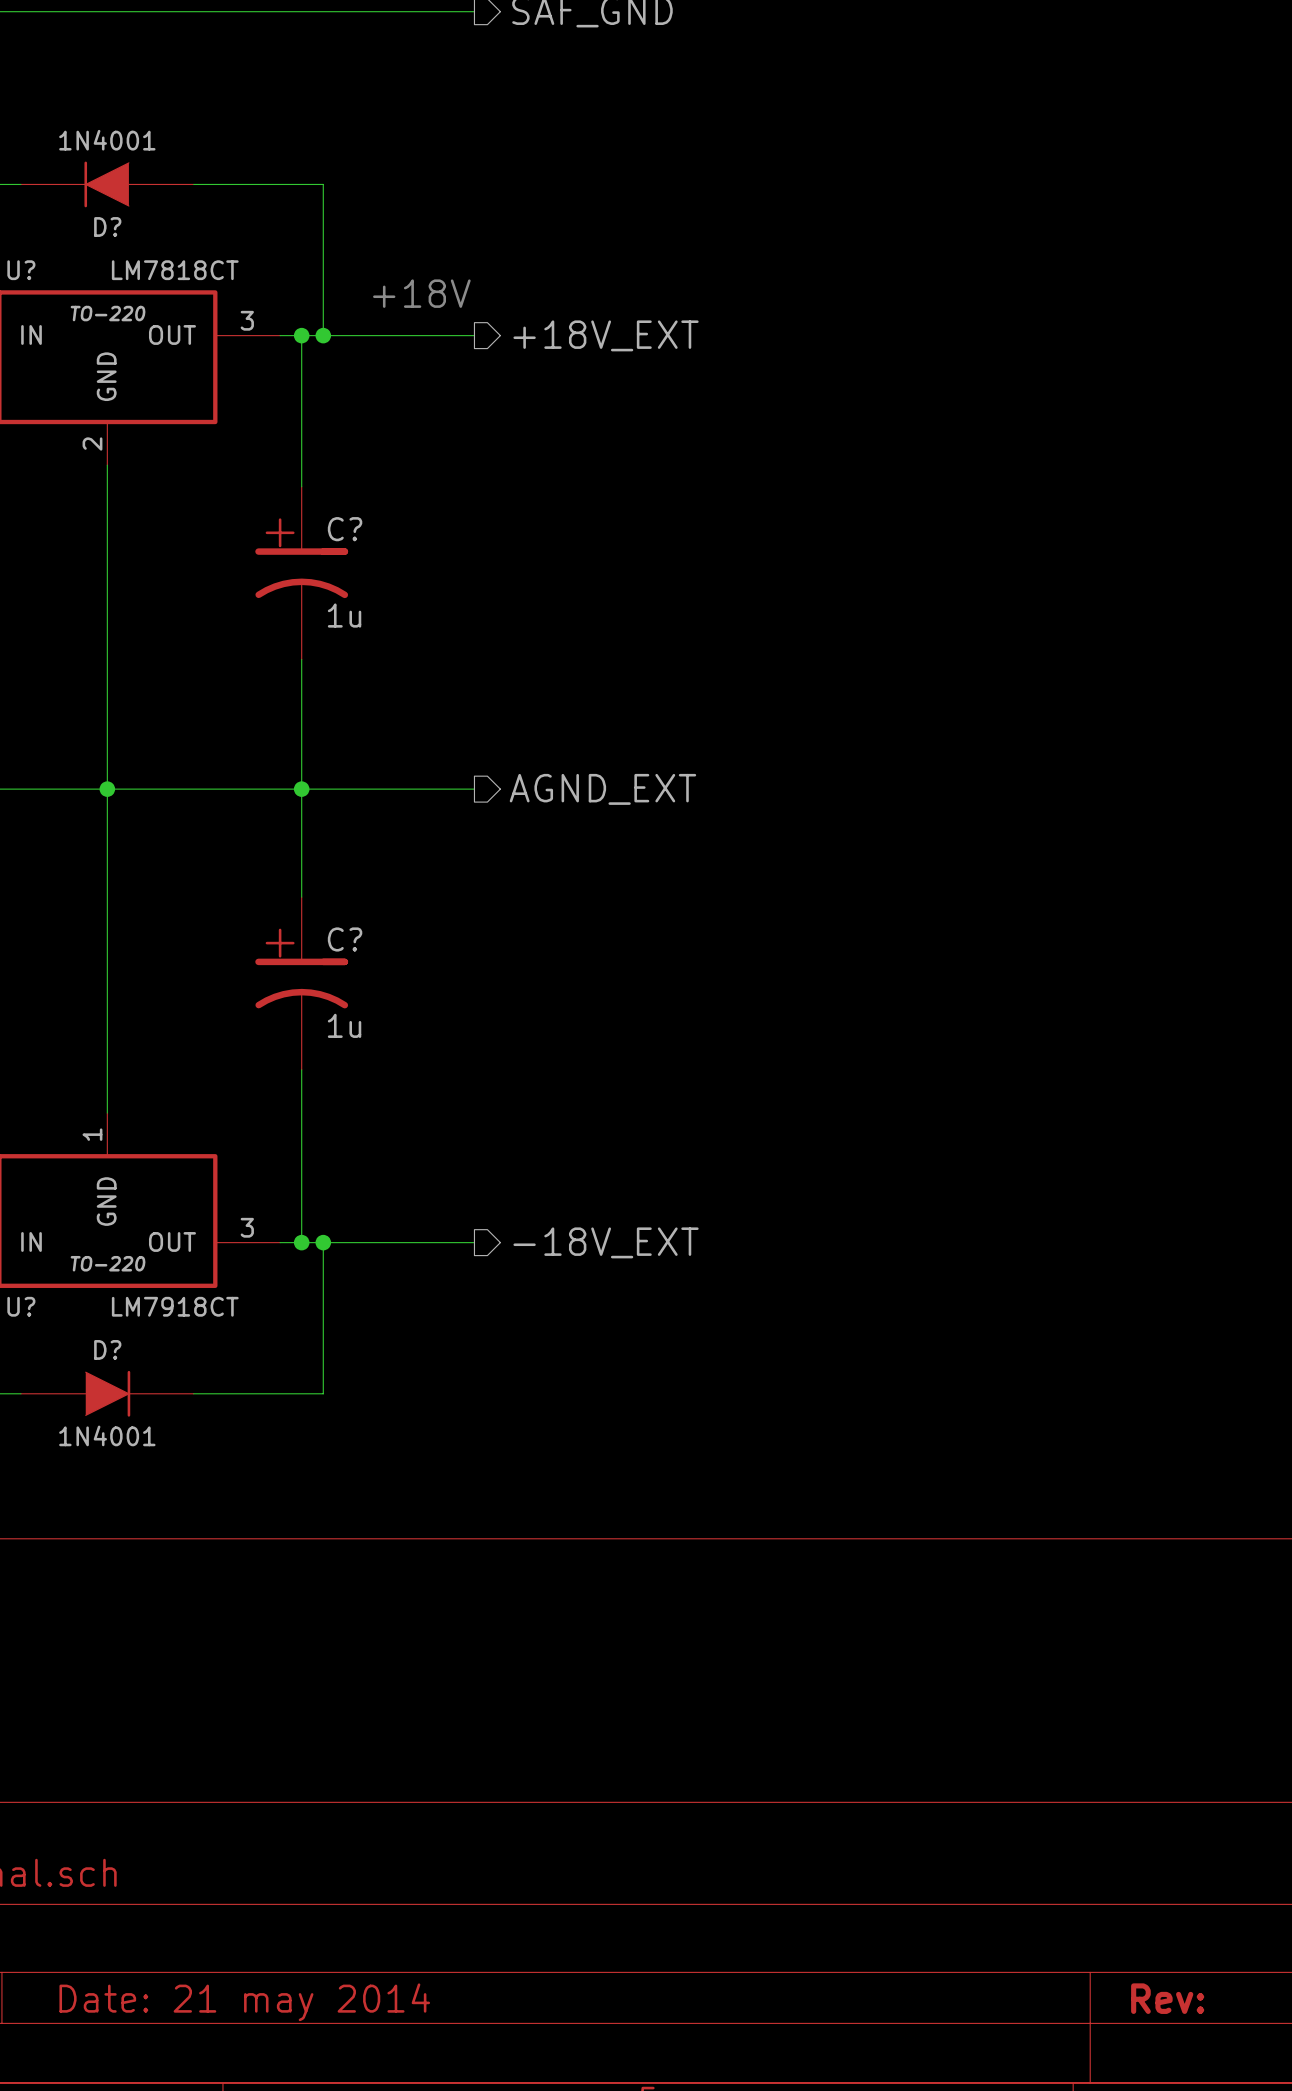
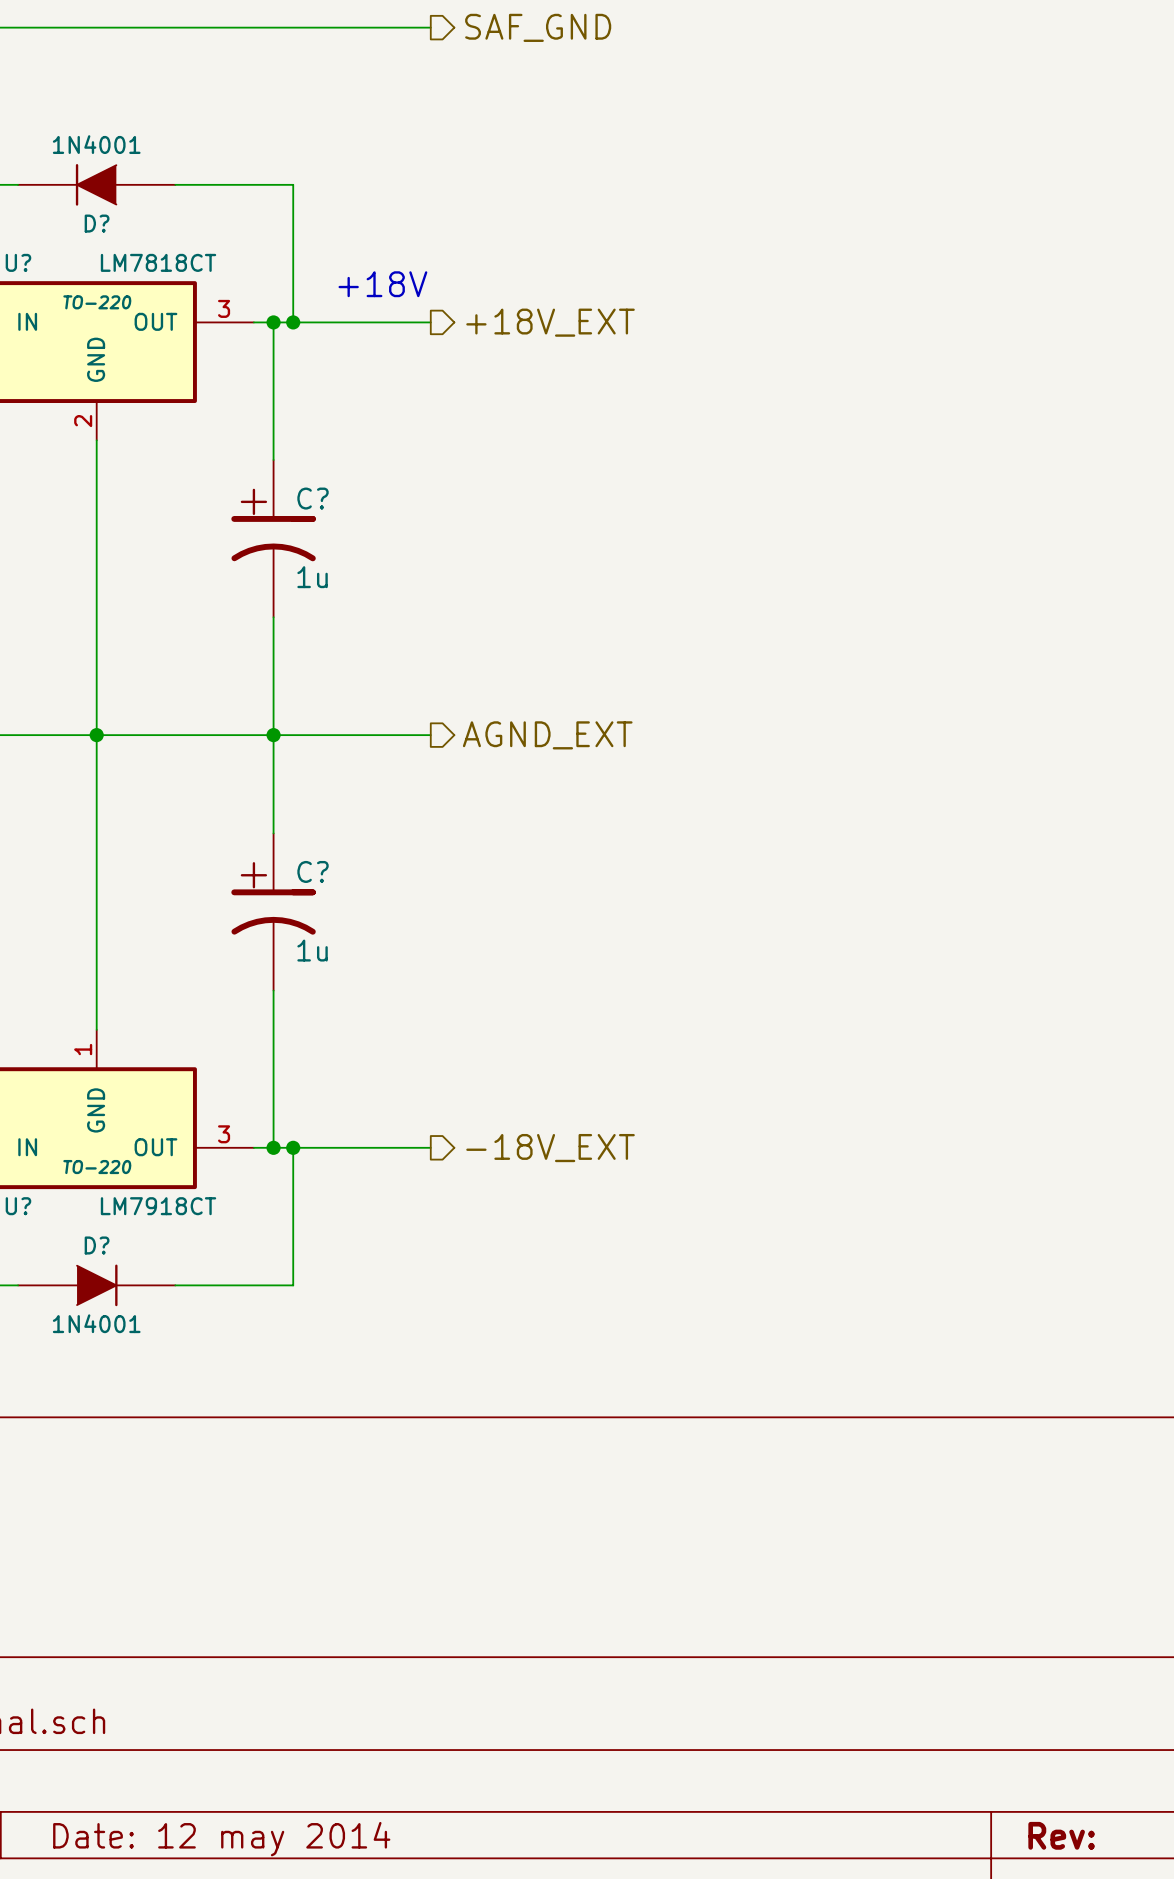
title block: Date: 21 may 2014 (244, 2002) -> Date: 12 may 2014 (221, 1839)

